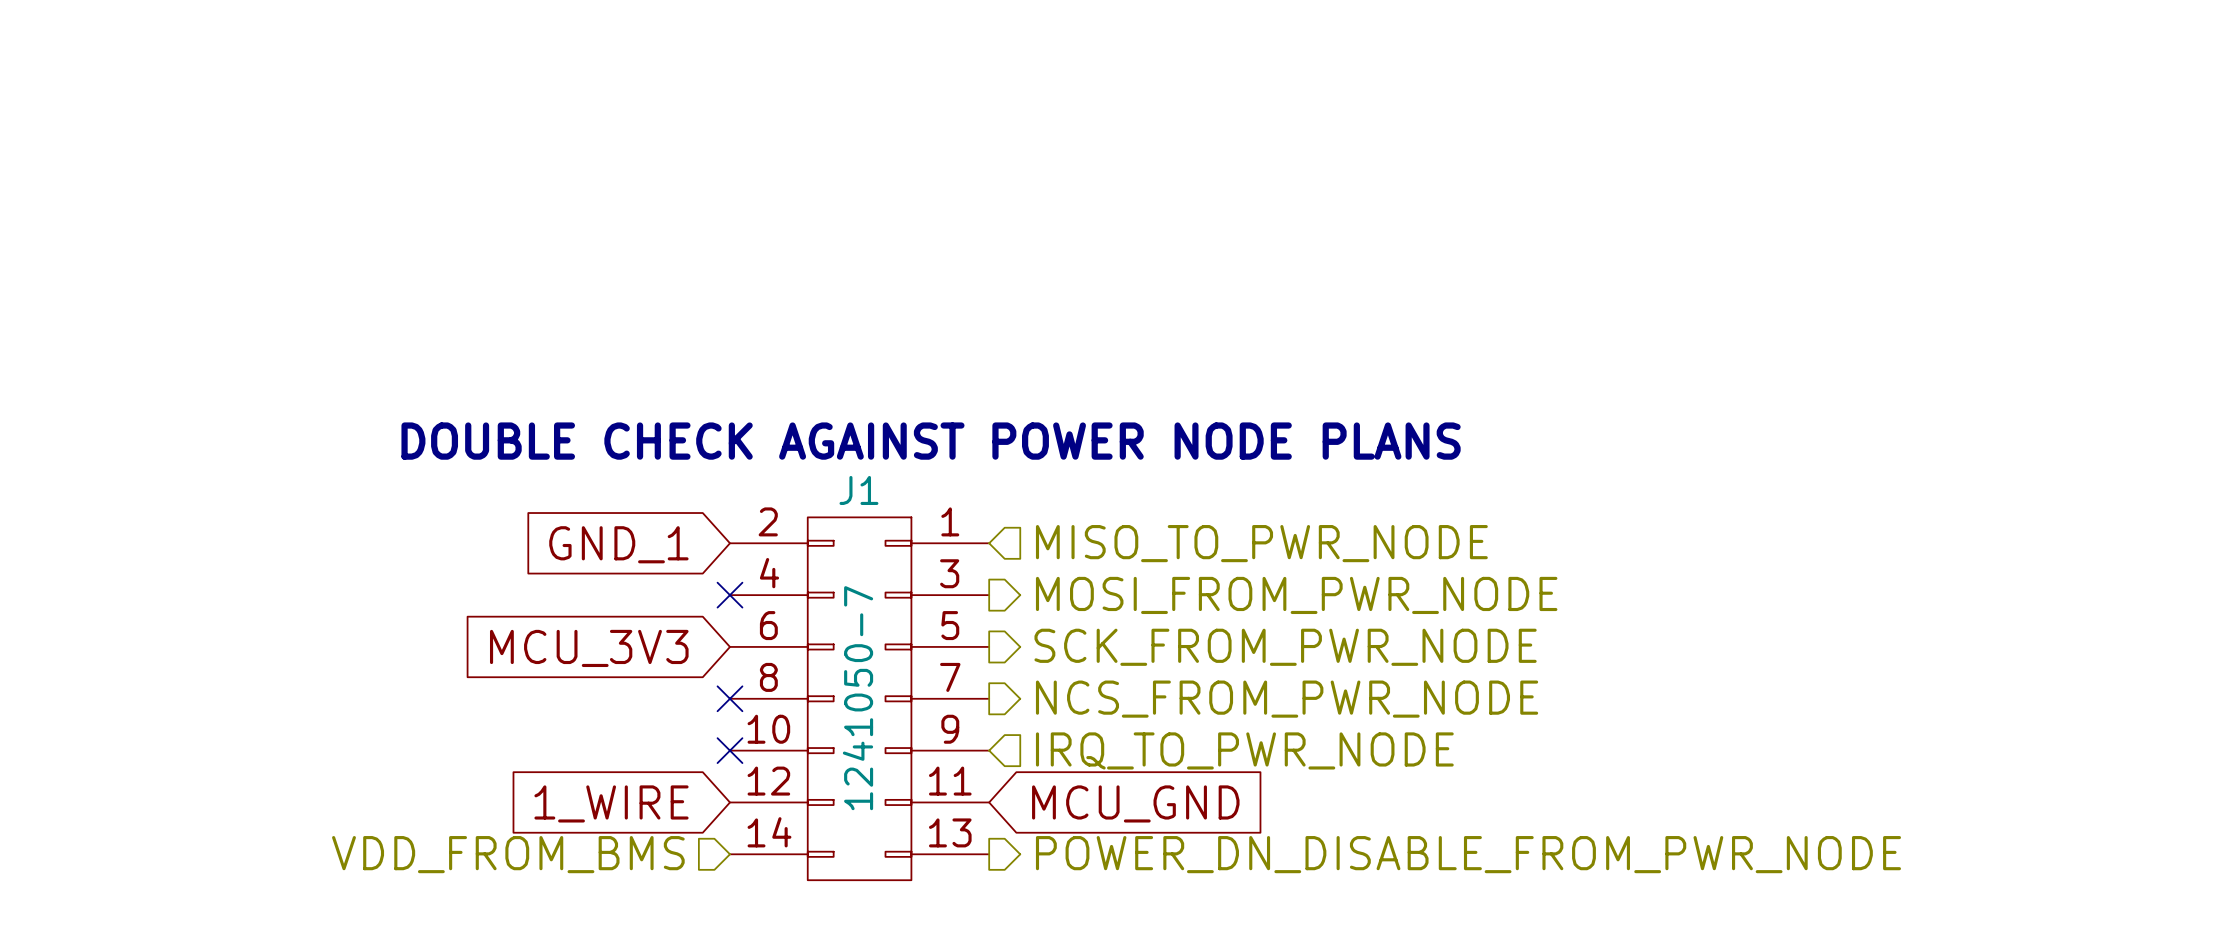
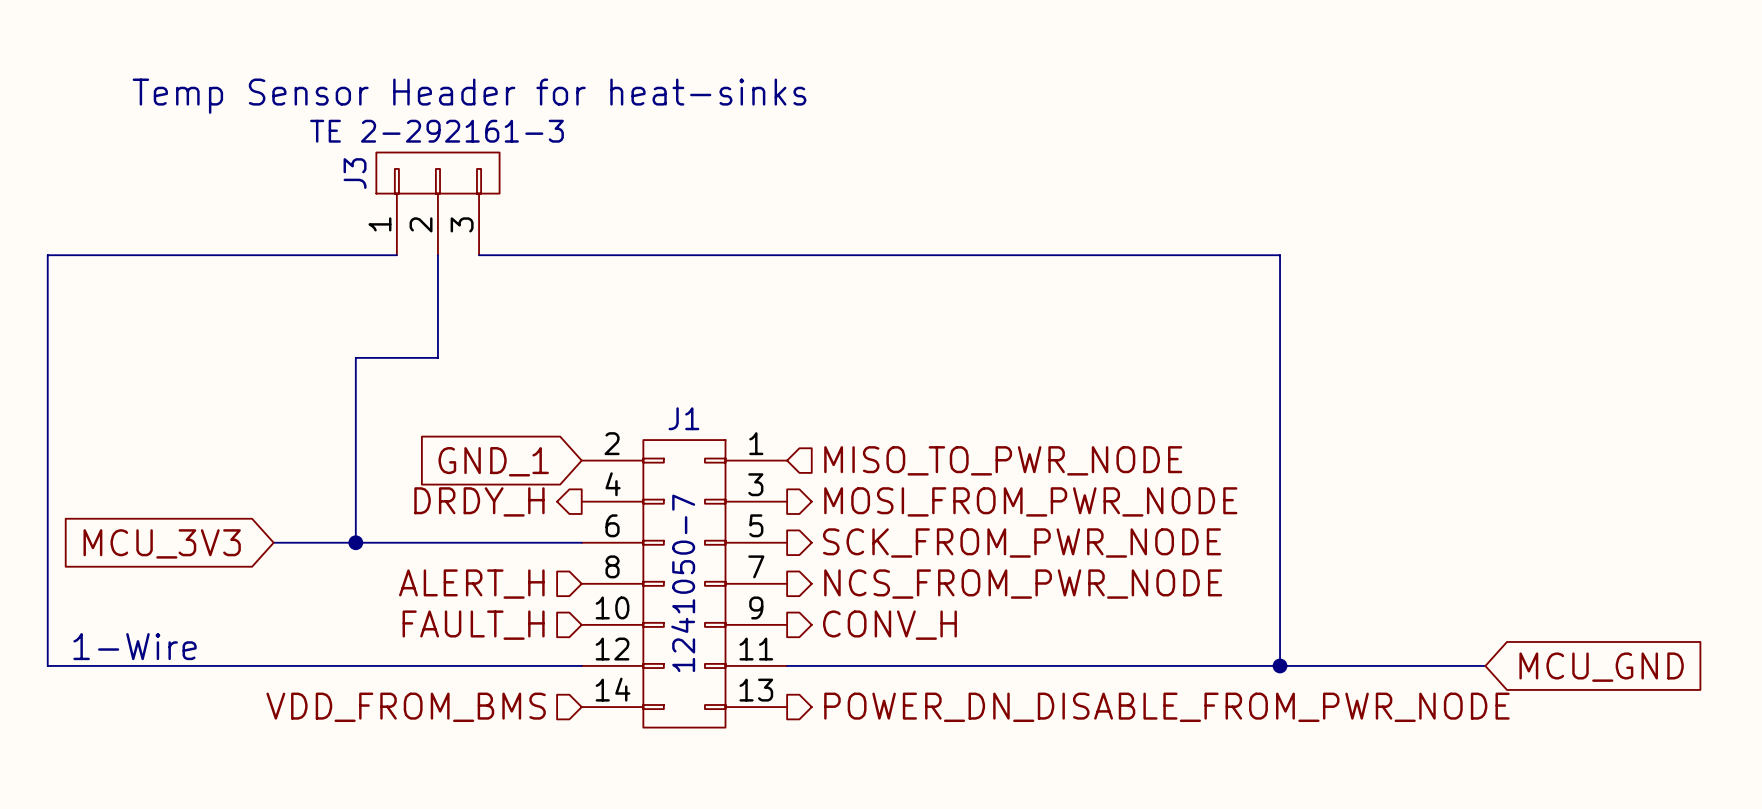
text: none -> Temp Sensor Header for heat-sinks (469, 96)
J3: none -> TE 2-292161-3 (437, 203)
wire: none -> (396, 255) (47, 255) (47, 665) (581, 665)
wire: none -> (437, 255) (437, 357) (355, 357) (355, 542)
wire: none -> (479, 255) (1280, 255) (1280, 665)
text: DOUBLE CHECK AGAINST POWER NODE PLANS (931, 441) -> none
hierarchical label: none -> DRDY_H (479, 501)
no-connect mark: (729, 595) -> none
wire: none -> (273, 542) (581, 542)
junction: none -> (355, 542)
global label position: MCU_3V3 (589, 648) -> MCU_3V3 (162, 543)
no-connect mark: (729, 698) -> none
hierarchical label: none -> ALERT_H (471, 584)
hierarchical label: none -> FAULT_H (473, 625)
no-connect mark: (729, 750) -> none
hierarchical label shape: input (1244, 750) -> output (889, 625)
hierarchical label: IRQ_TO_PWR_NODE (1244, 750) -> CONV_H (889, 625)
text: none -> 1-Wire (135, 646)
wire: none -> (787, 665) (1485, 665)
junction: none -> (1280, 665)
global label: 1_WIRE (611, 803) -> none
global label: MCU_GND (1135, 803) -> none
global label: none -> MCU_GND (1601, 667)

